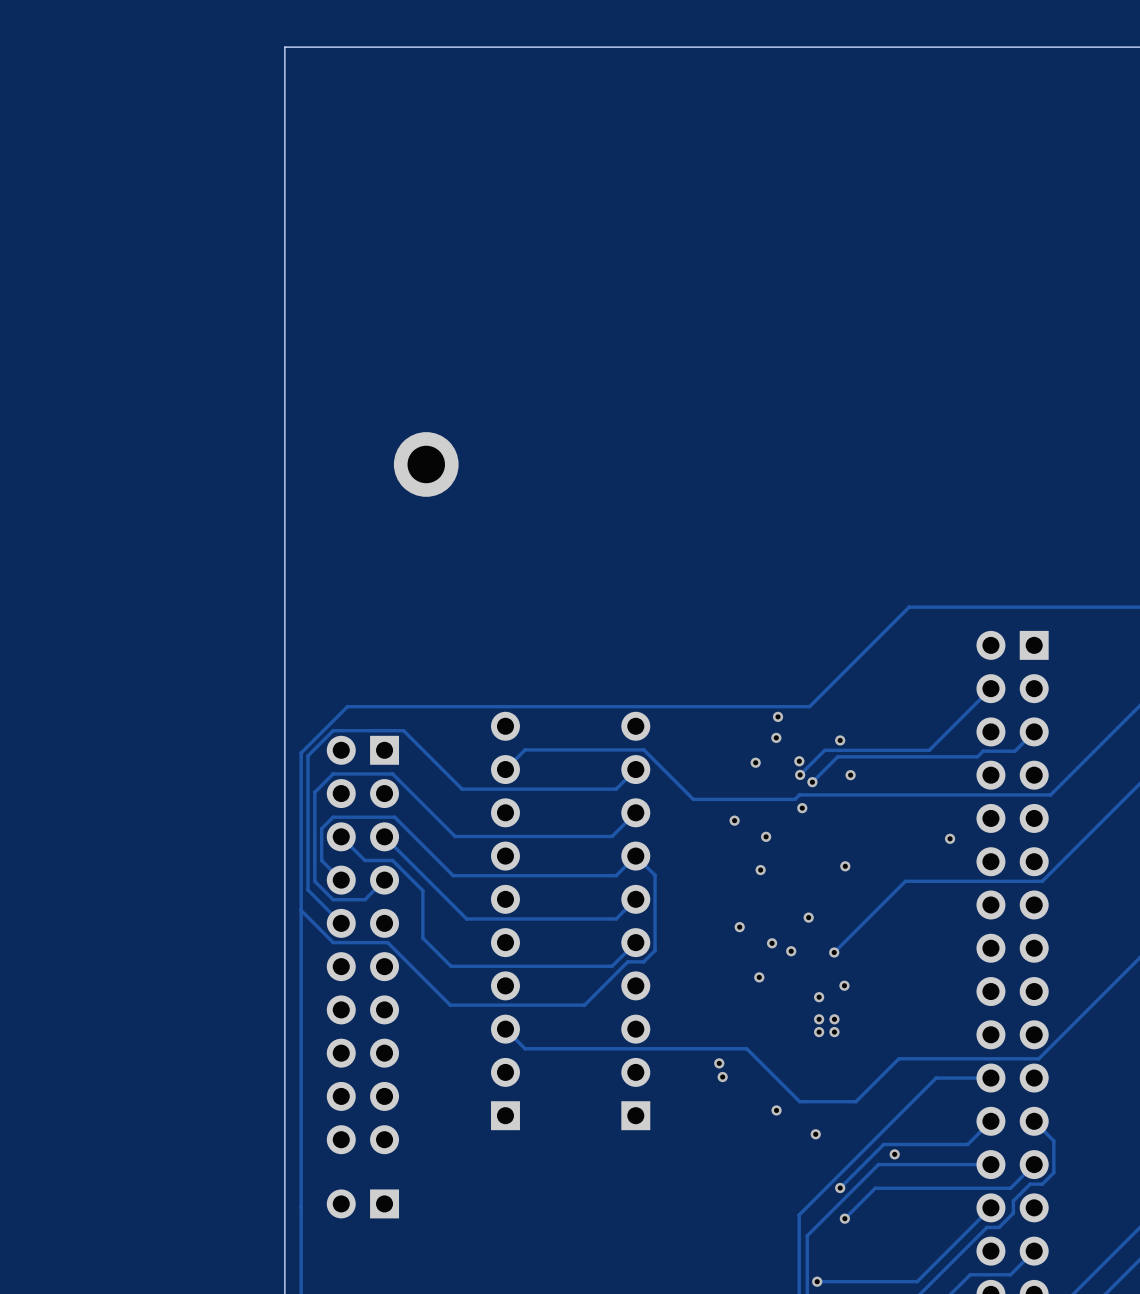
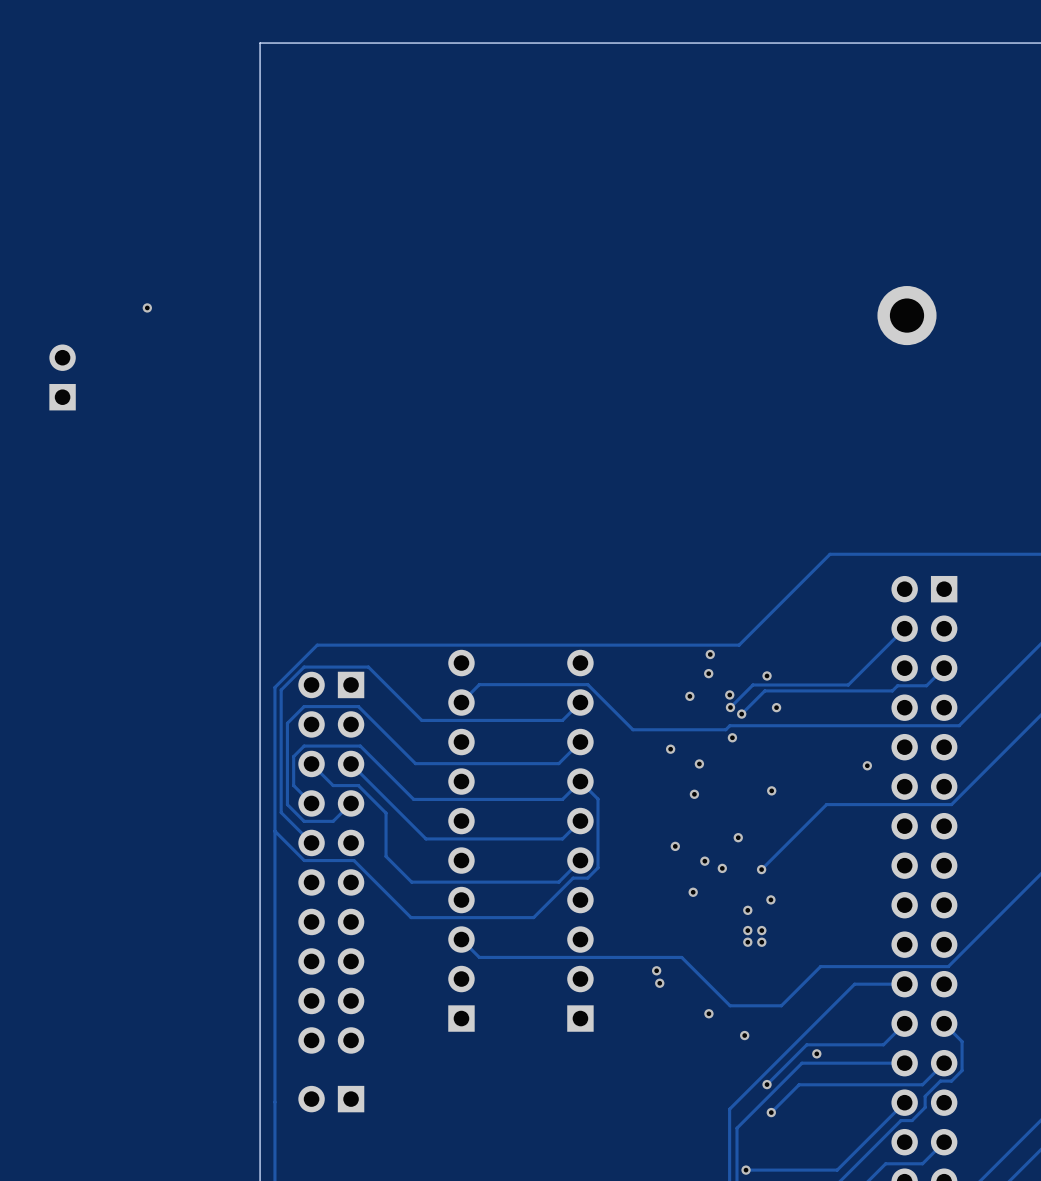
via: none -> (147, 307)
part: none -> (906, 315)
part: none -> (62, 377)
part: (426, 464) -> none

